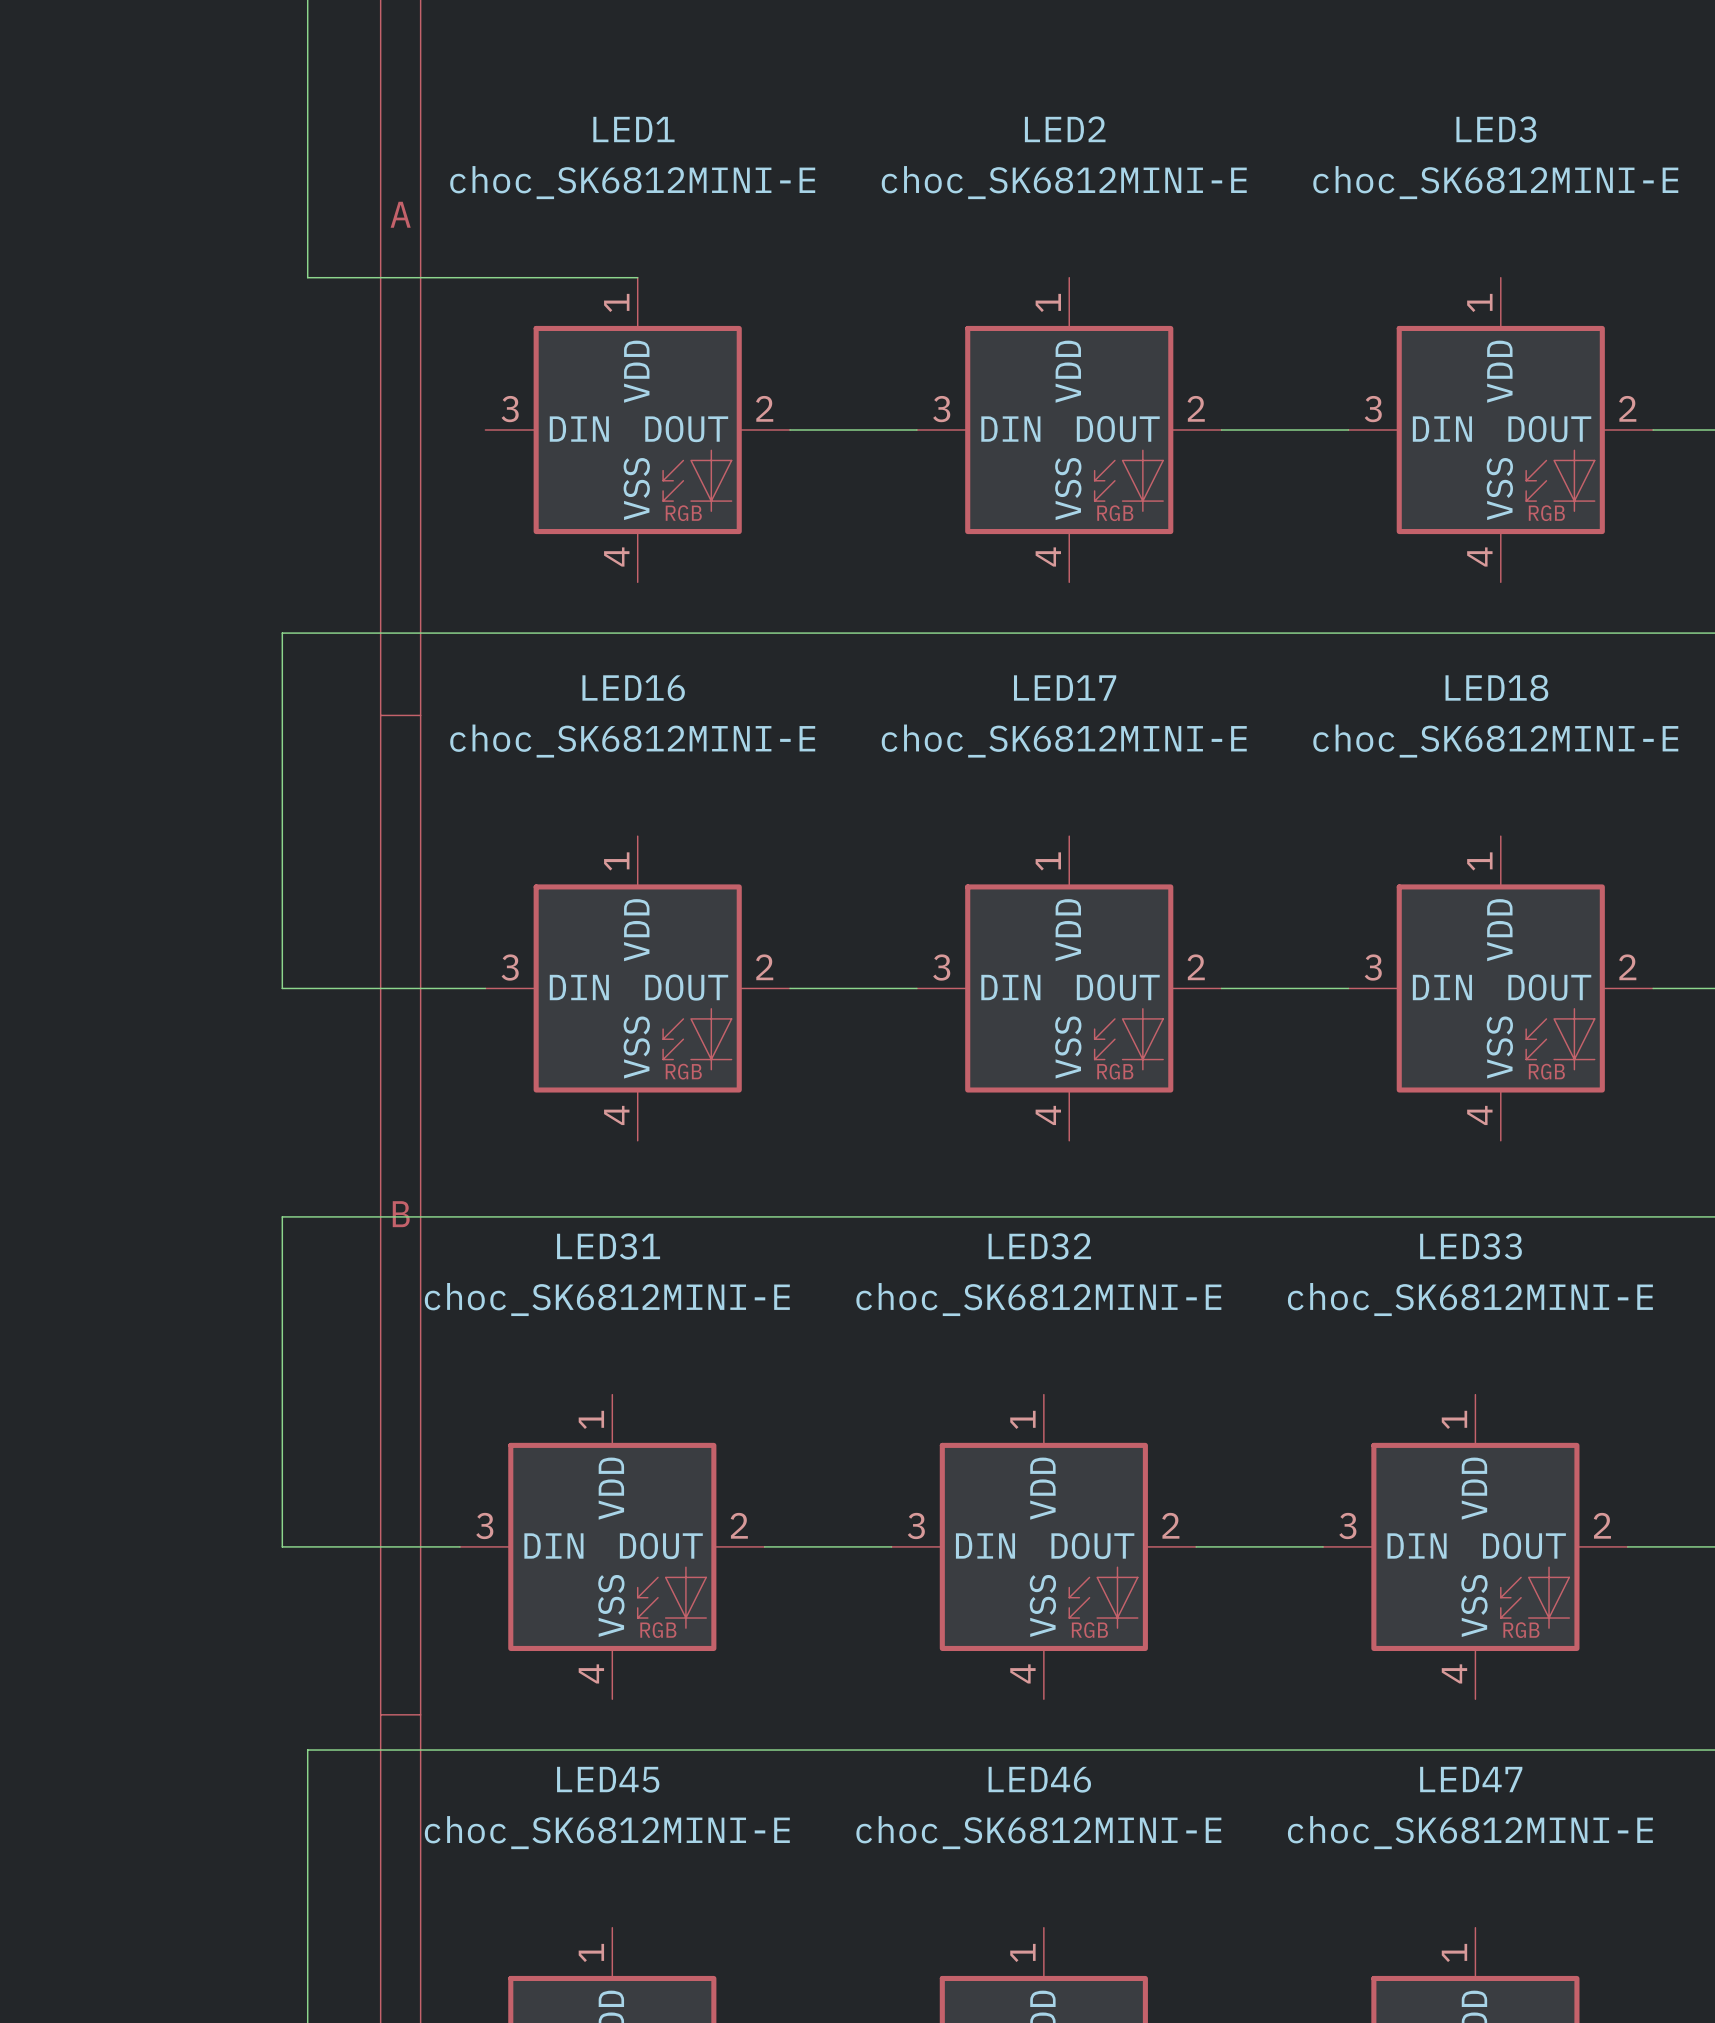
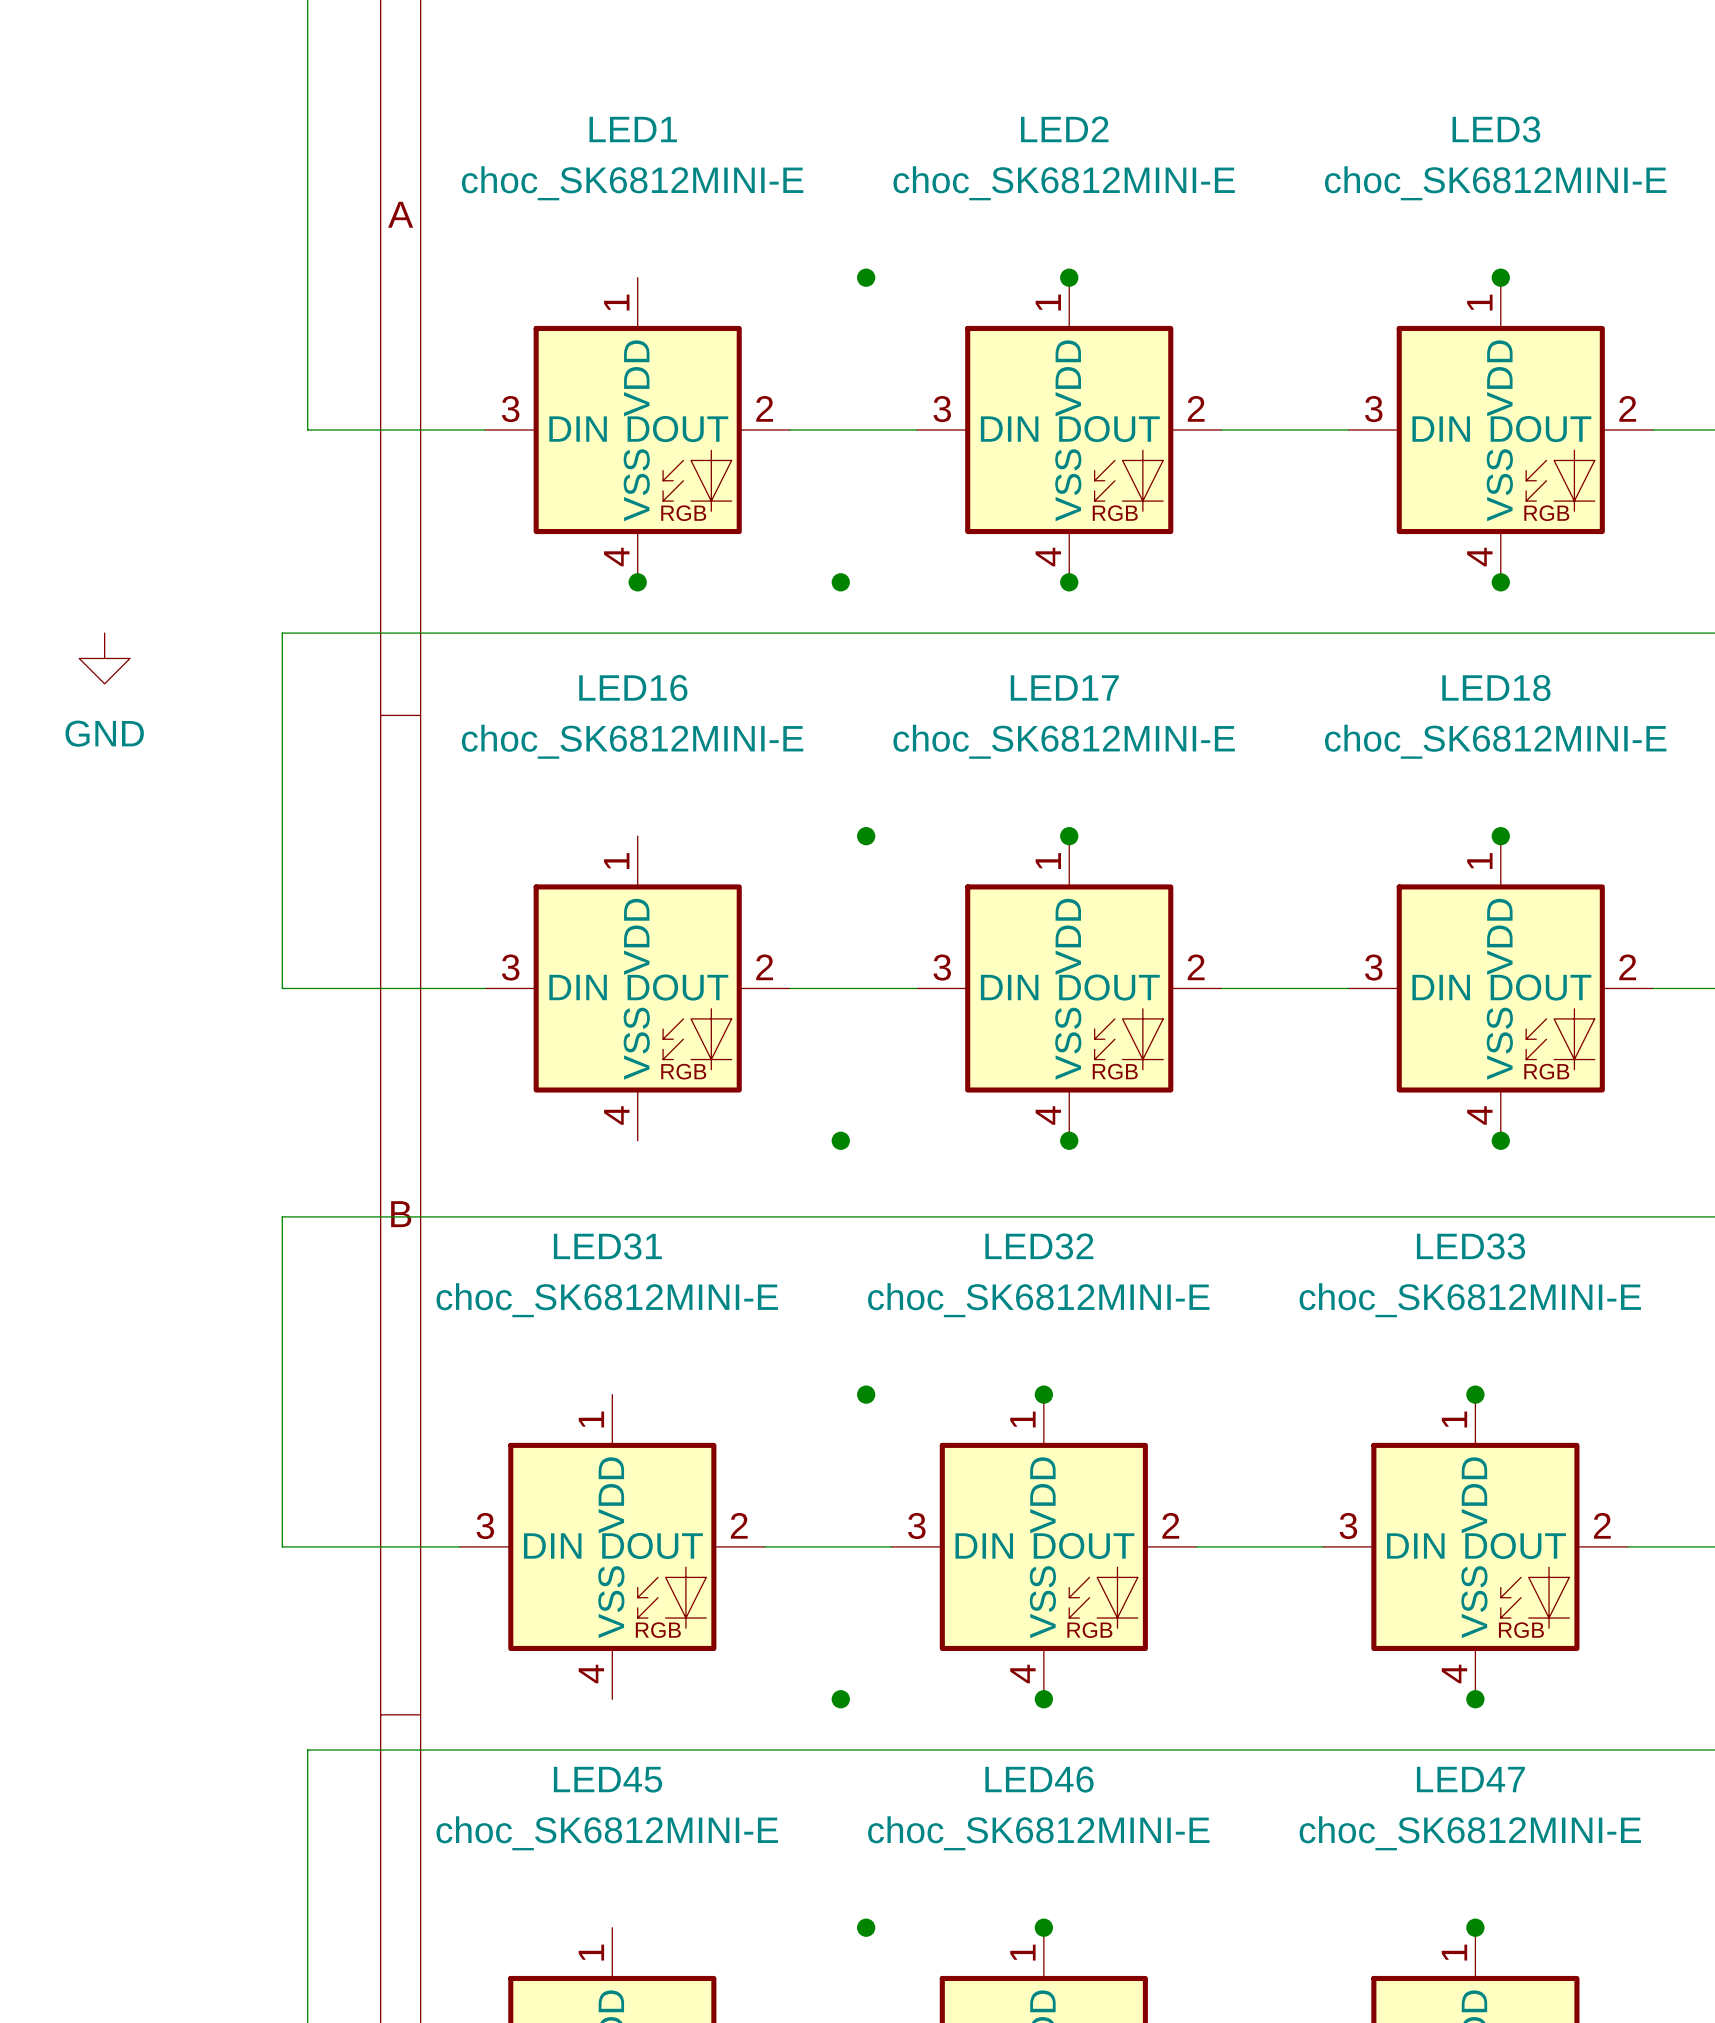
wire: (307, 277) (637, 277) -> (307, 277) (307, 430) (485, 430)
junction: none -> (866, 277)
junction: none -> (1069, 277)
junction: none -> (1500, 277)
junction: none -> (637, 582)
junction: none -> (840, 582)
junction: none -> (1069, 582)
junction: none -> (1500, 582)
power symbol: none -> GND (104, 658)
junction: none -> (866, 836)
junction: none -> (1069, 836)
junction: none -> (1500, 836)
junction: none -> (840, 1140)
junction: none -> (1069, 1140)
junction: none -> (1500, 1140)
junction: none -> (866, 1394)
junction: none -> (1043, 1394)
junction: none -> (1475, 1394)
junction: none -> (840, 1699)
junction: none -> (1043, 1699)
junction: none -> (1475, 1699)
junction: none -> (866, 1927)
junction: none -> (1043, 1927)
junction: none -> (1475, 1927)

